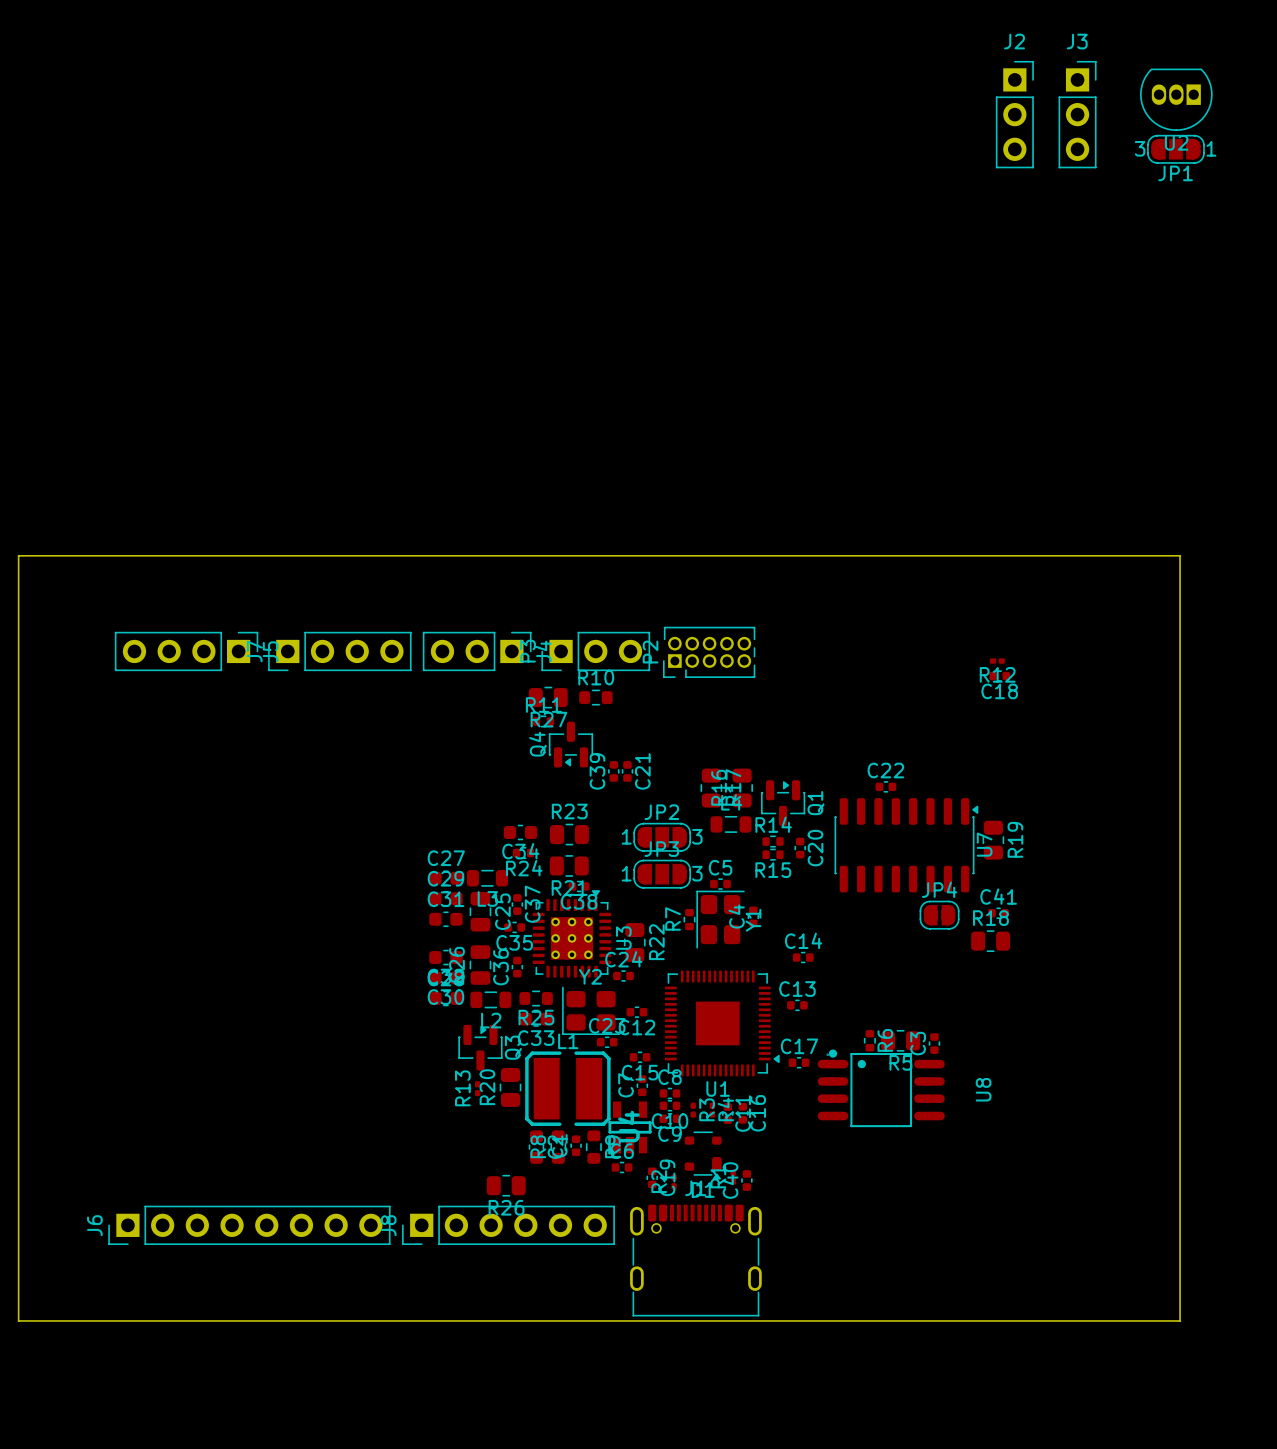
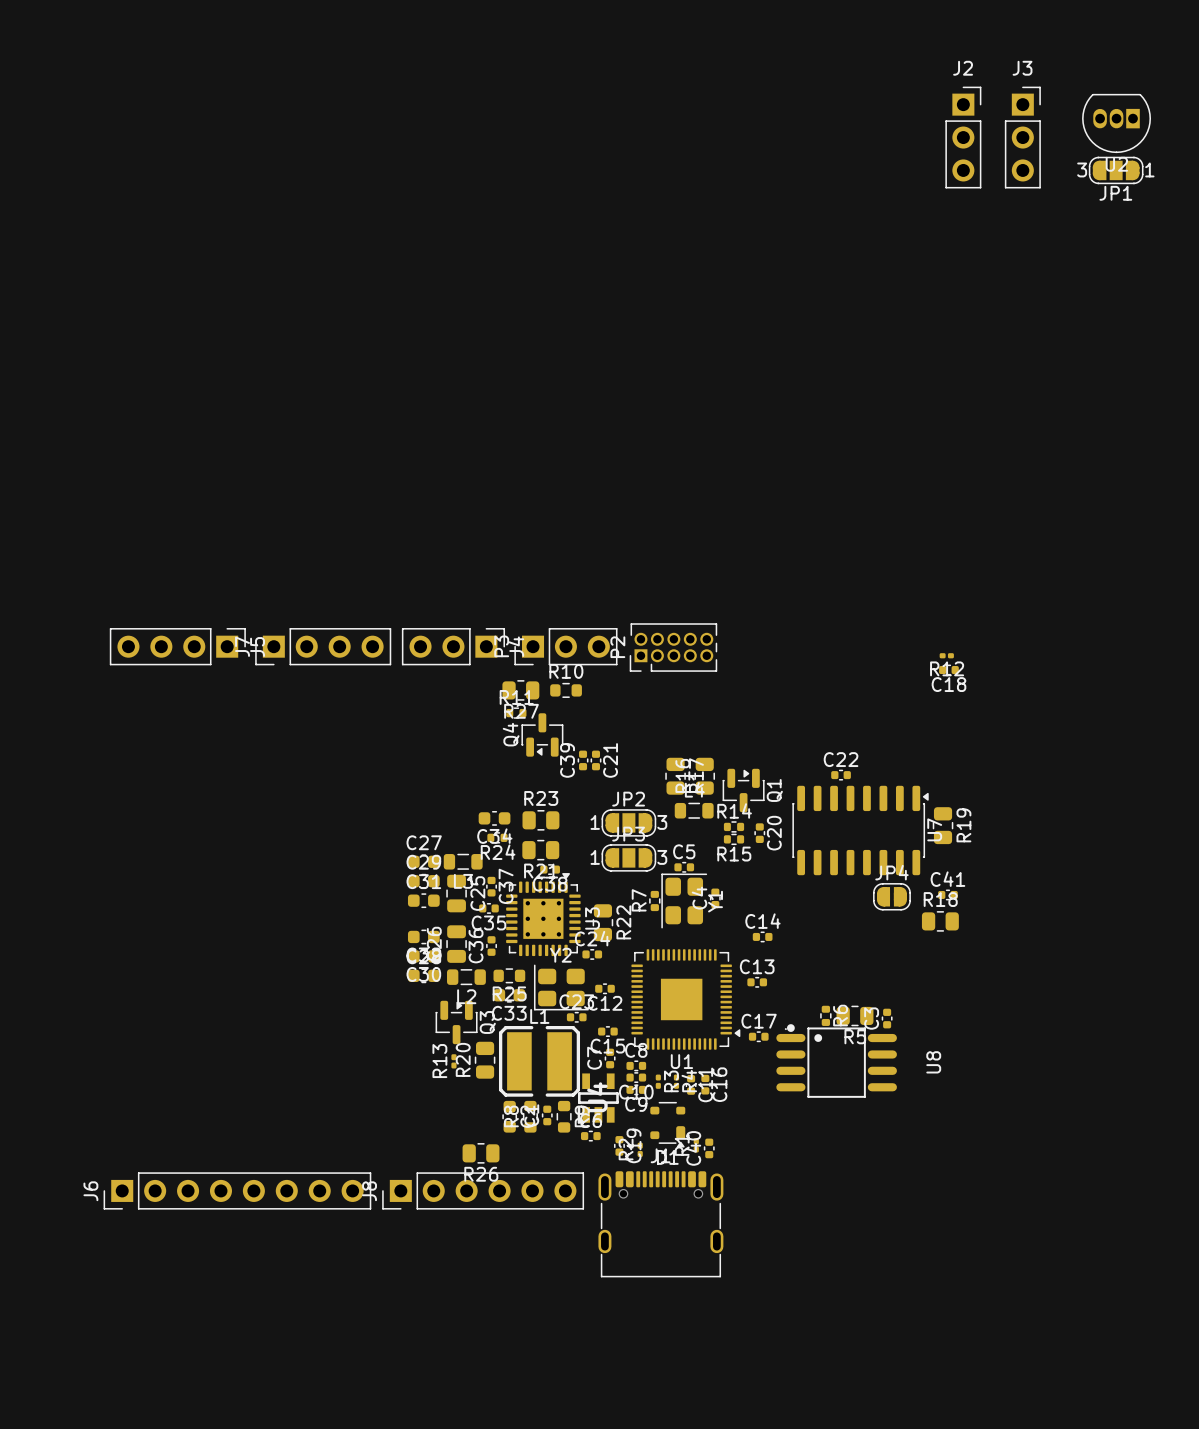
board edge: (18, 555) (1180, 555) (1180, 1320) (18, 1320) (18, 555) -> none

